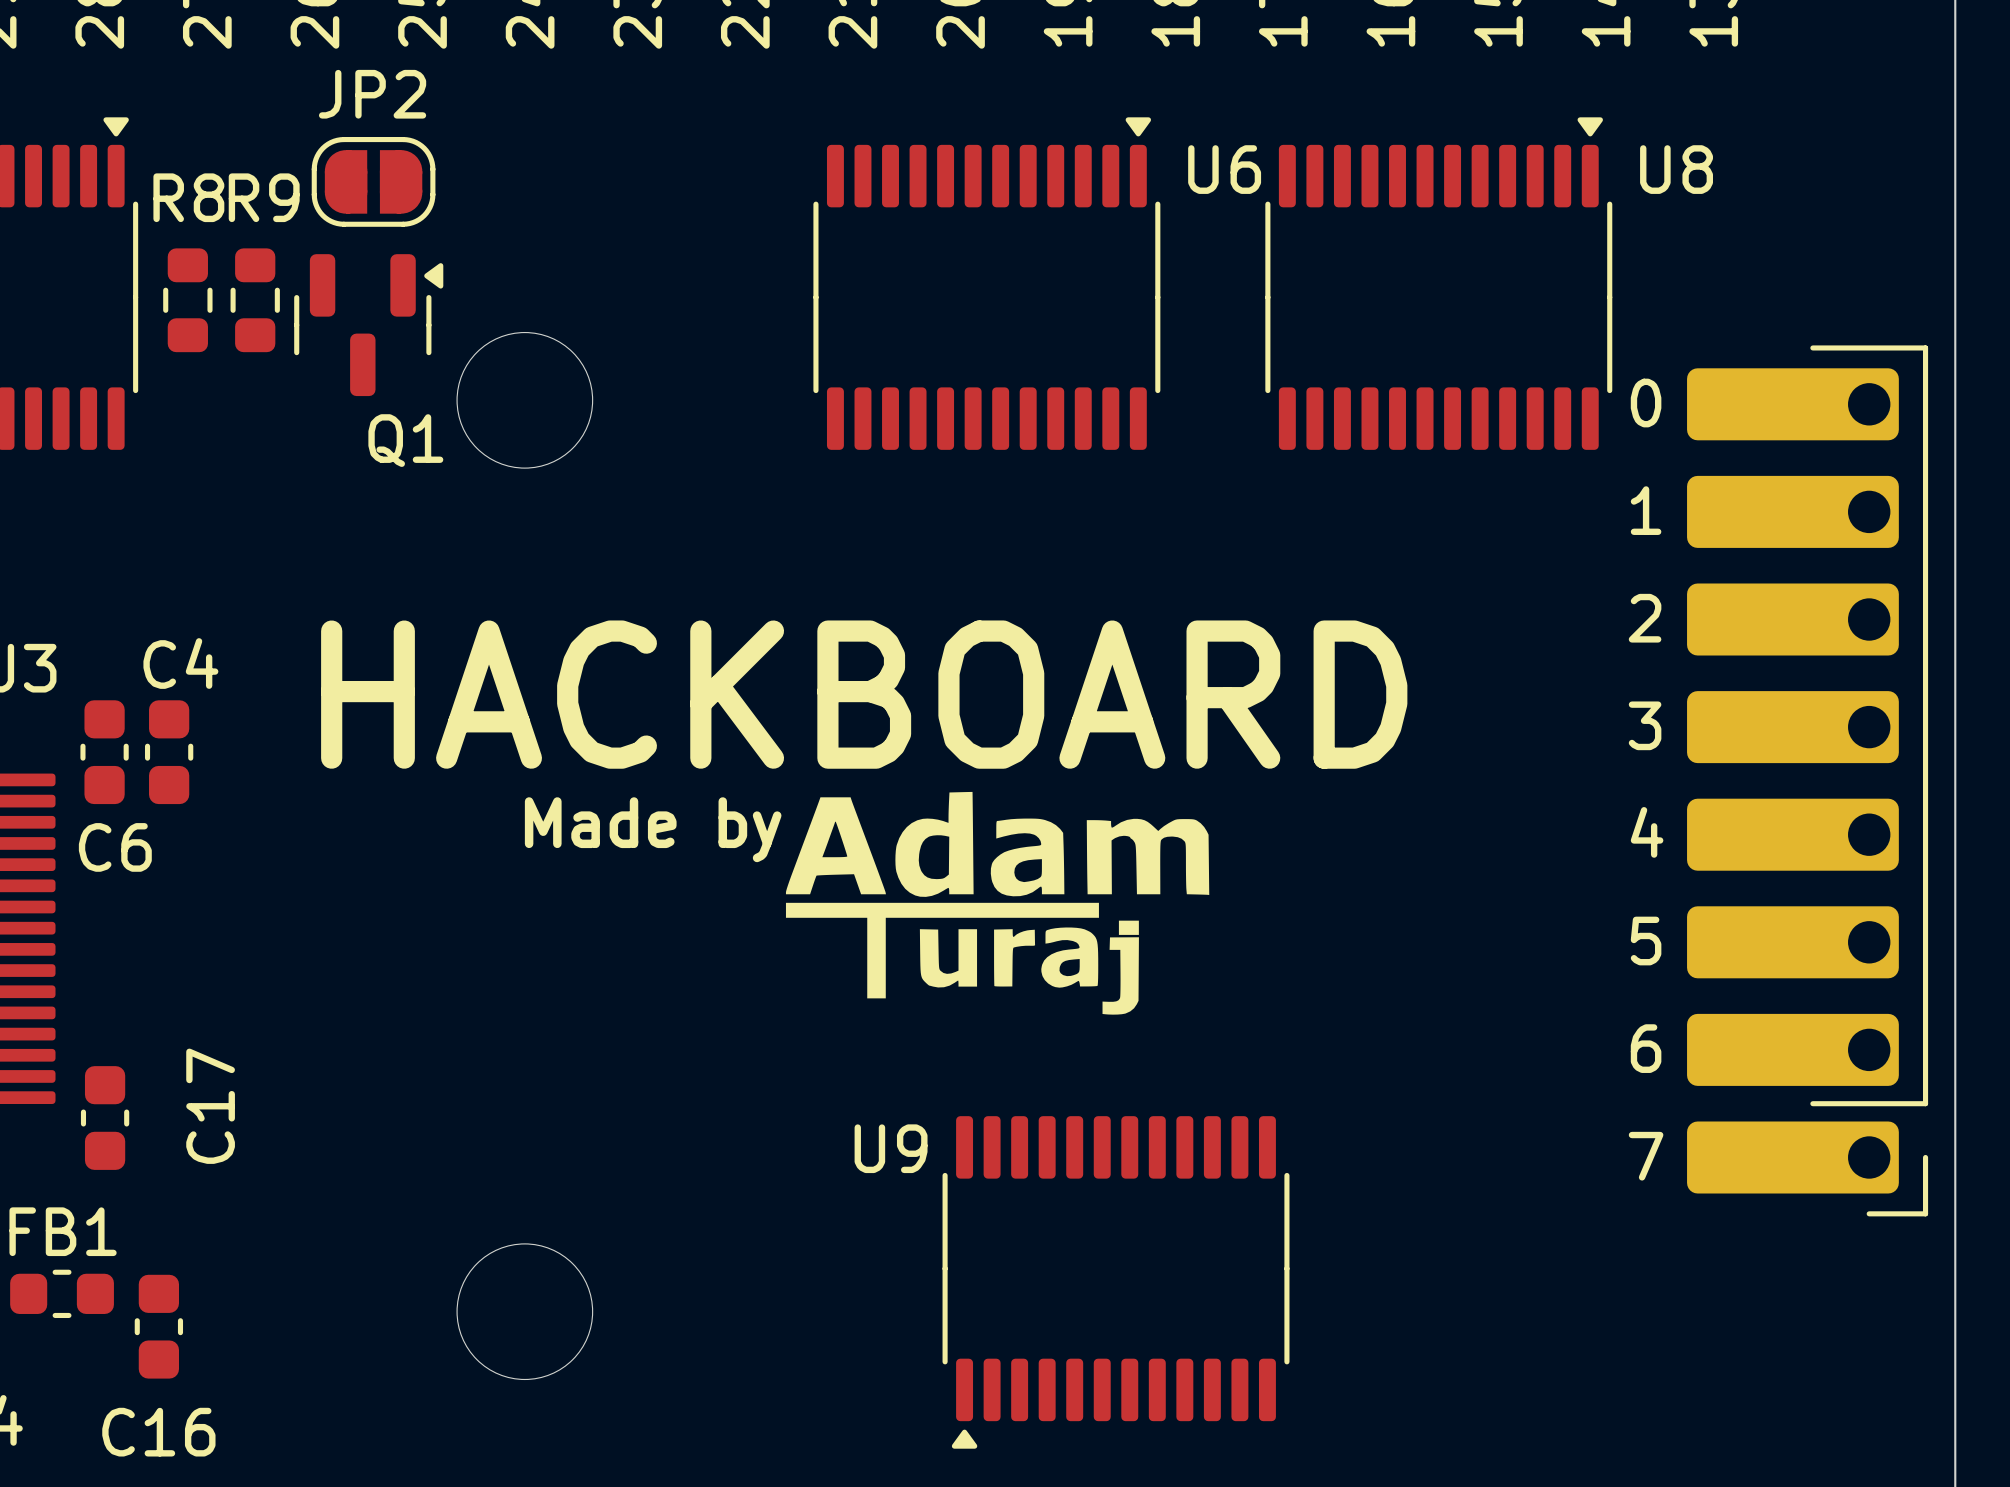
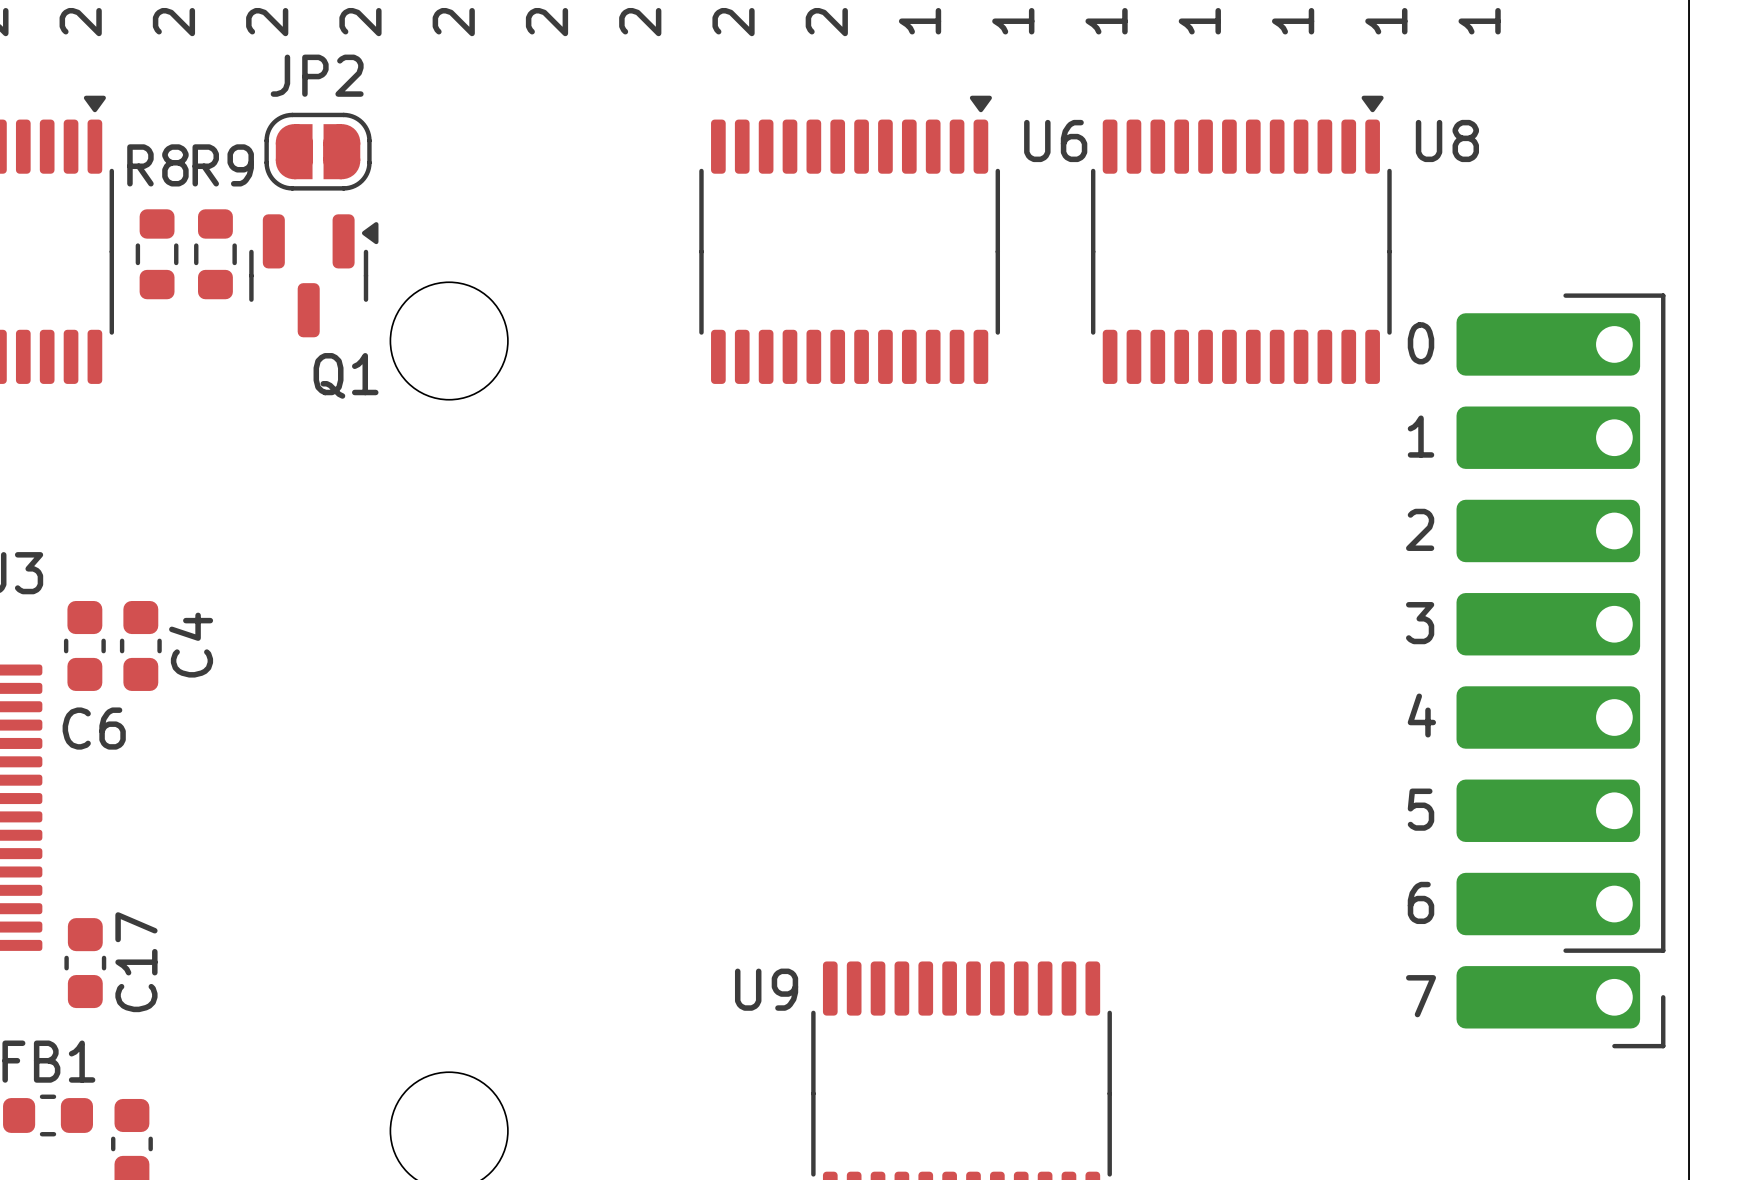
C4 name rotation: 0° (180, 663) -> 90° counterclockwise (191, 645)
text: HACKBOARD (864, 694) -> none
drawing: [785, 791, 1210, 1015] -> none
text: Made by (653, 829) -> none
C17 name position: C17 (210, 1106) -> C17 (136, 962)

